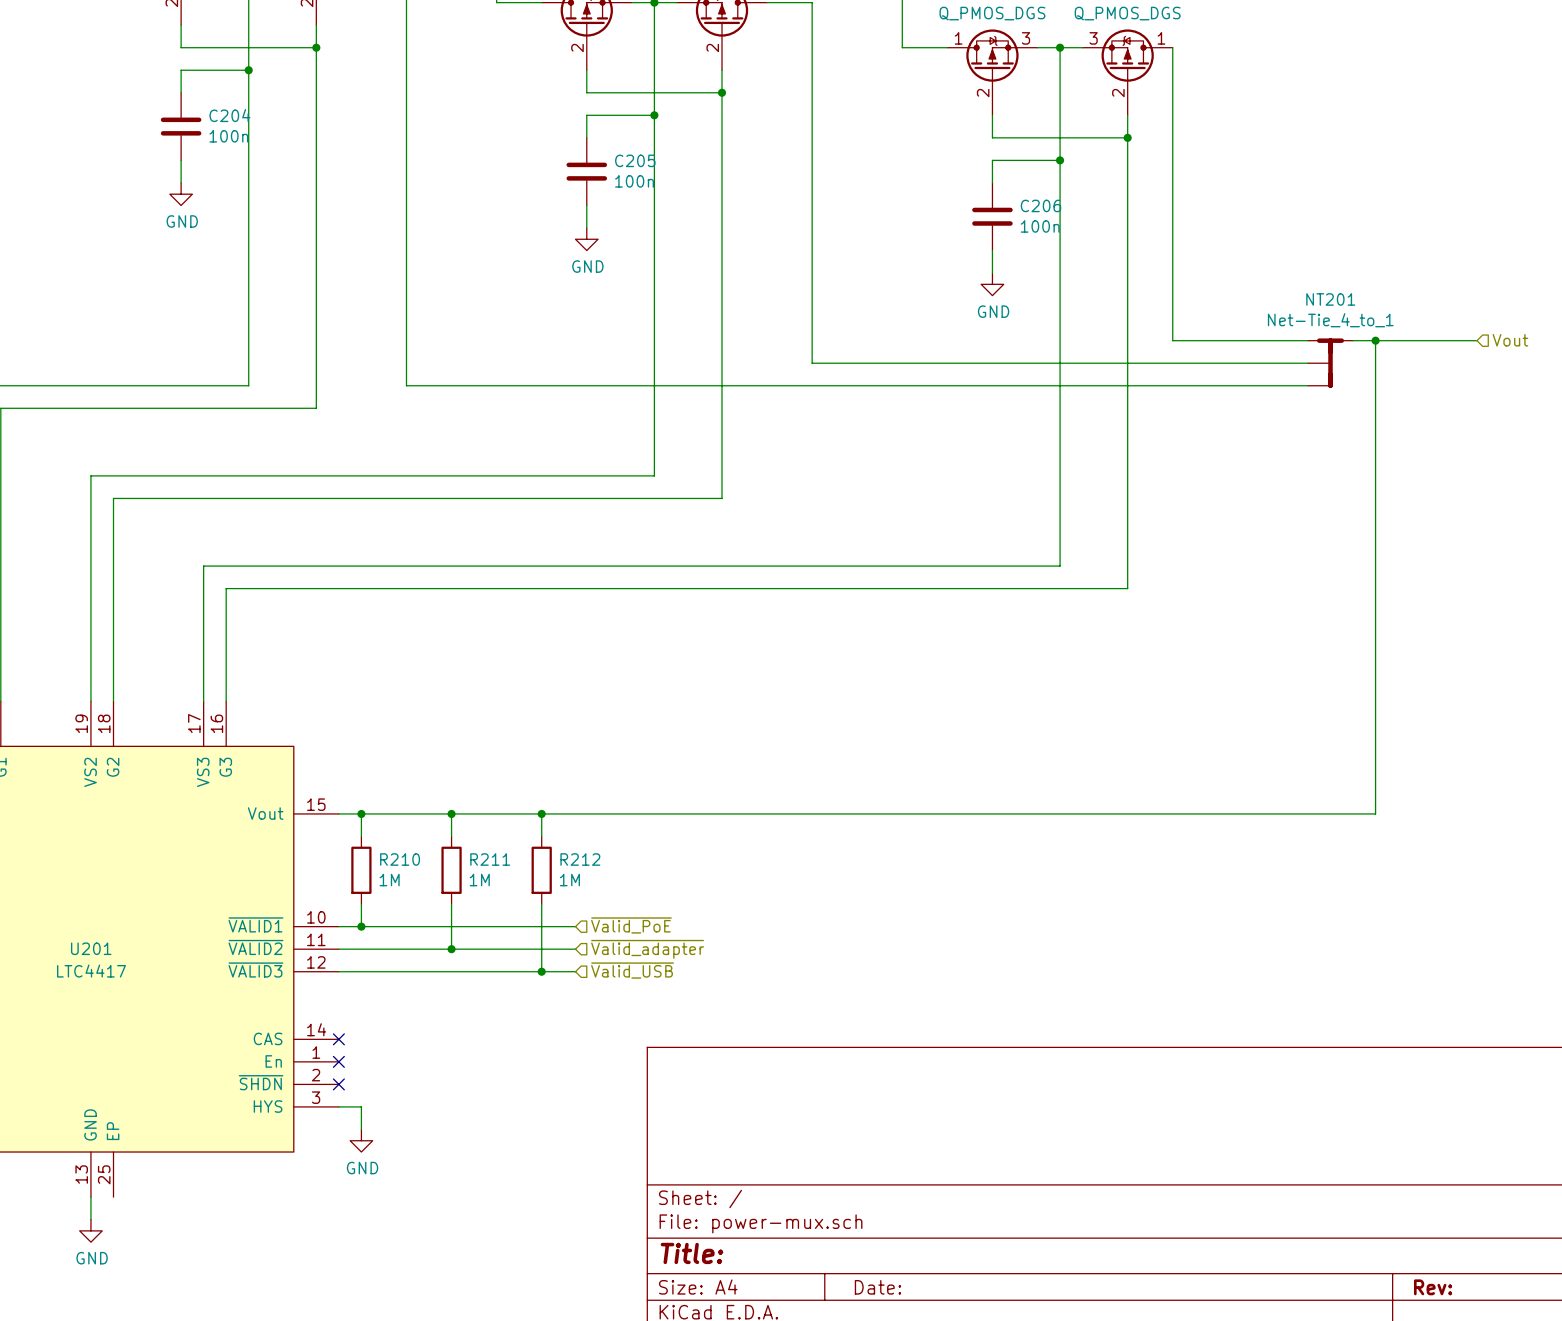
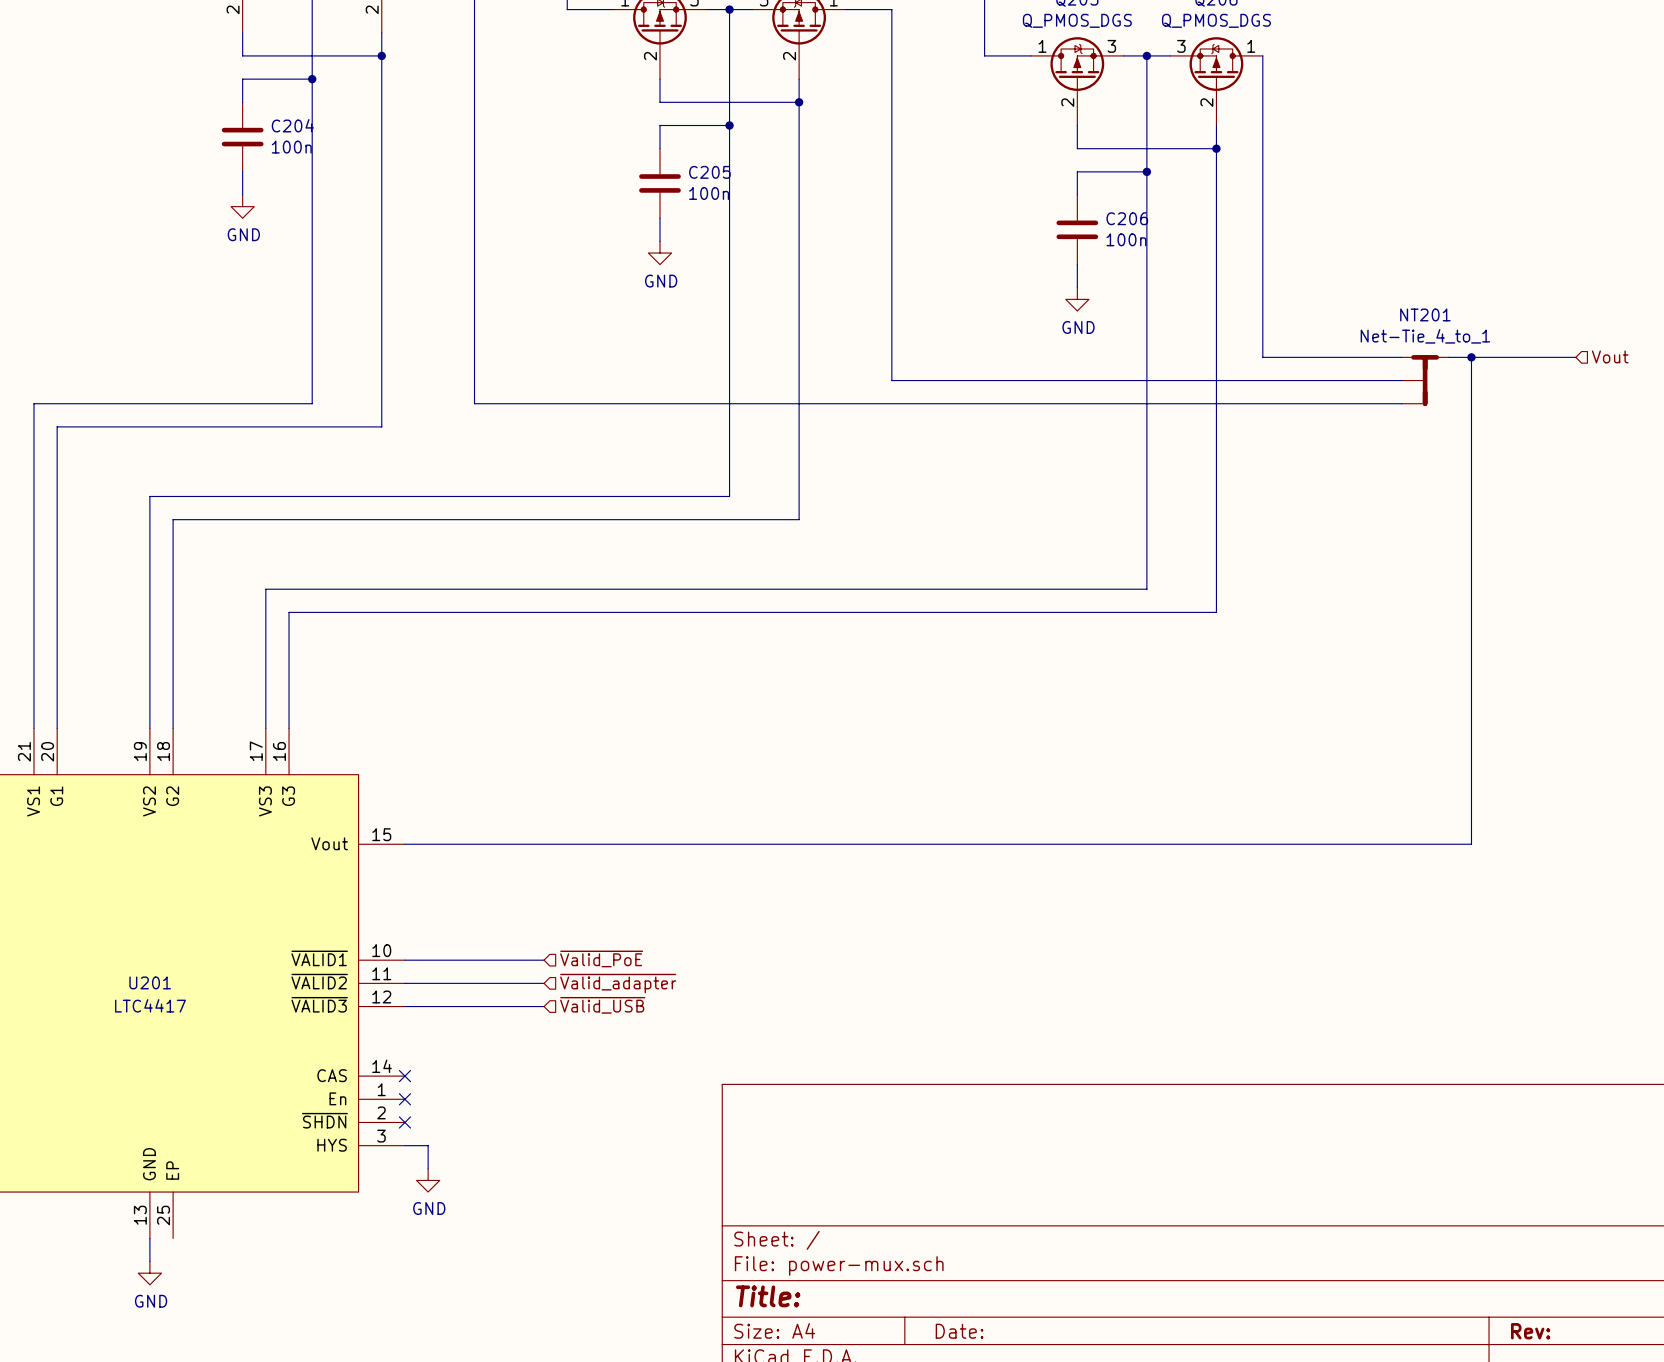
wire: (361, 813) (361, 836) -> none
junction: (361, 813) -> none
wire: (451, 813) (451, 836) -> none
junction: (451, 813) -> none
wire: (541, 813) (541, 836) -> none
junction: (541, 813) -> none
R210: 1M (361, 870) -> none
R211: 1M (451, 870) -> none
R212: 1M (541, 870) -> none
wire: (361, 904) (361, 926) -> none
wire: (451, 904) (451, 949) -> none
wire: (541, 904) (541, 971) -> none
hierarchical label position: ~{Valid_PoE} (631, 925) -> ~{Valid_PoE} (601, 958)
junction: (361, 926) -> none
wire: (474, 926) (575, 926) -> none
junction: (451, 949) -> none
wire: (474, 949) (575, 949) -> none
hierarchical label position: ~{Valid_adapter} (647, 949) -> ~{Valid_adapter} (618, 983)
hierarchical label position: ~{Valid_USB} (632, 970) -> ~{Valid_USB} (602, 1005)
wire: (474, 971) (575, 971) -> none
junction: (541, 971) -> none

